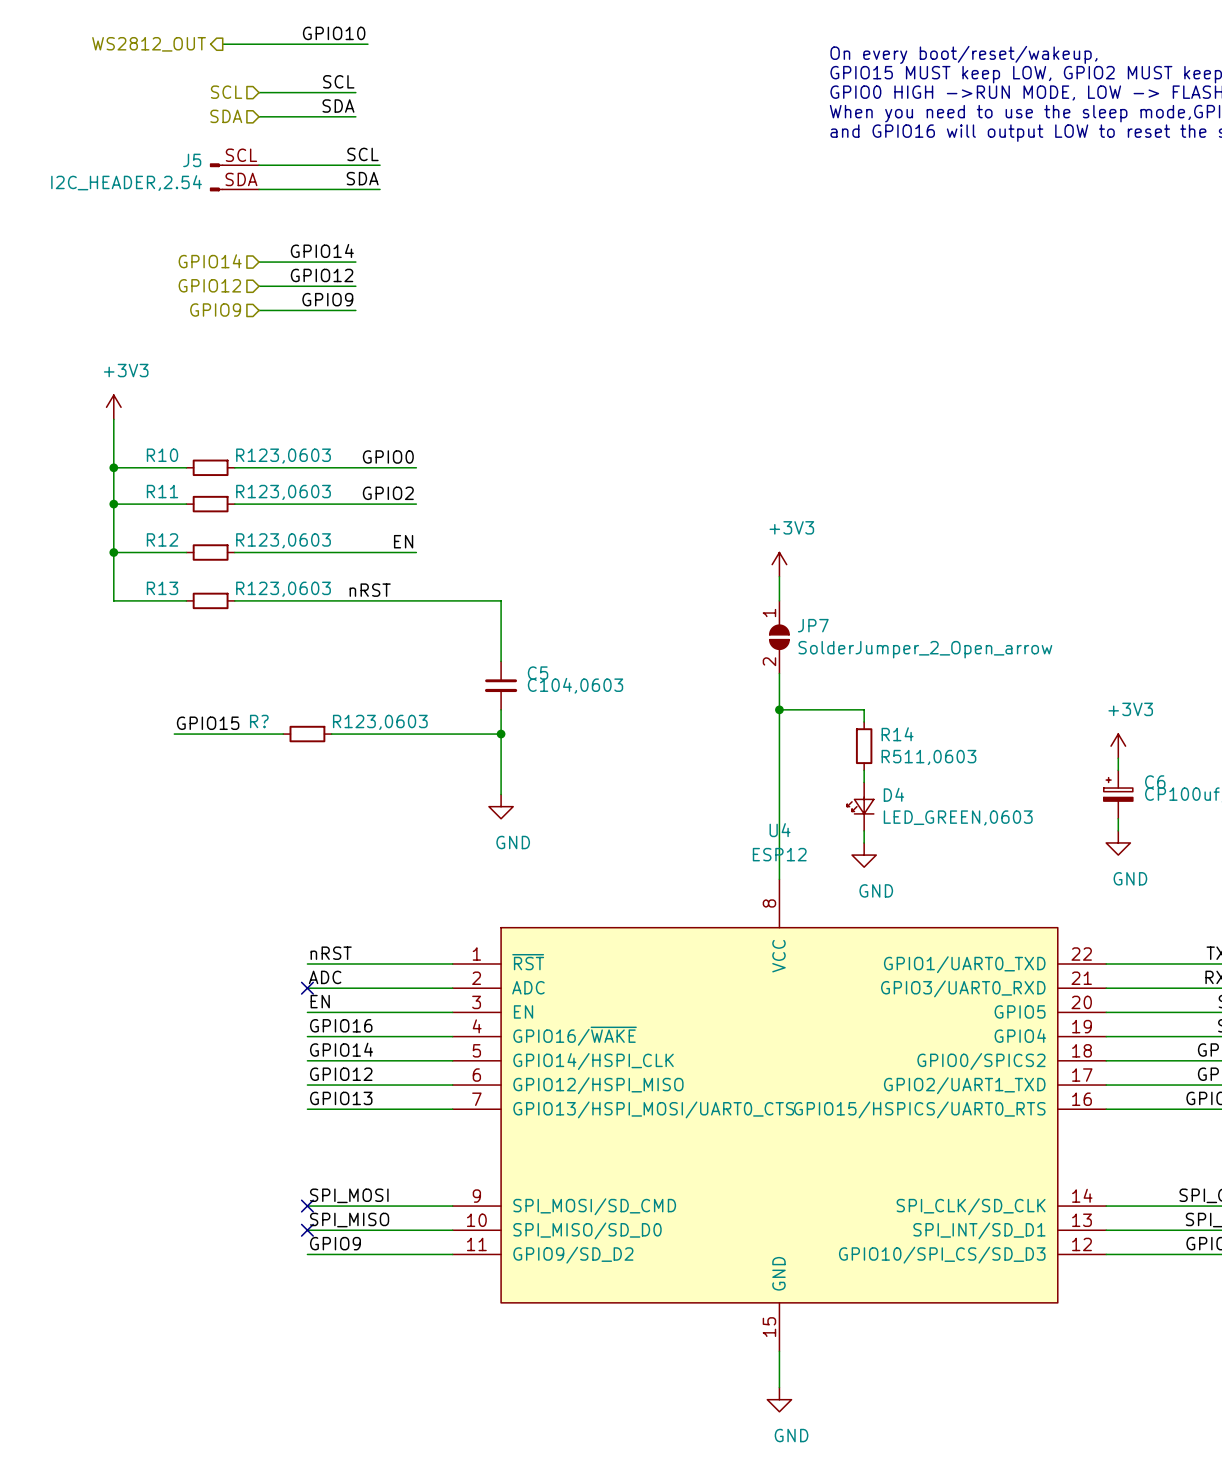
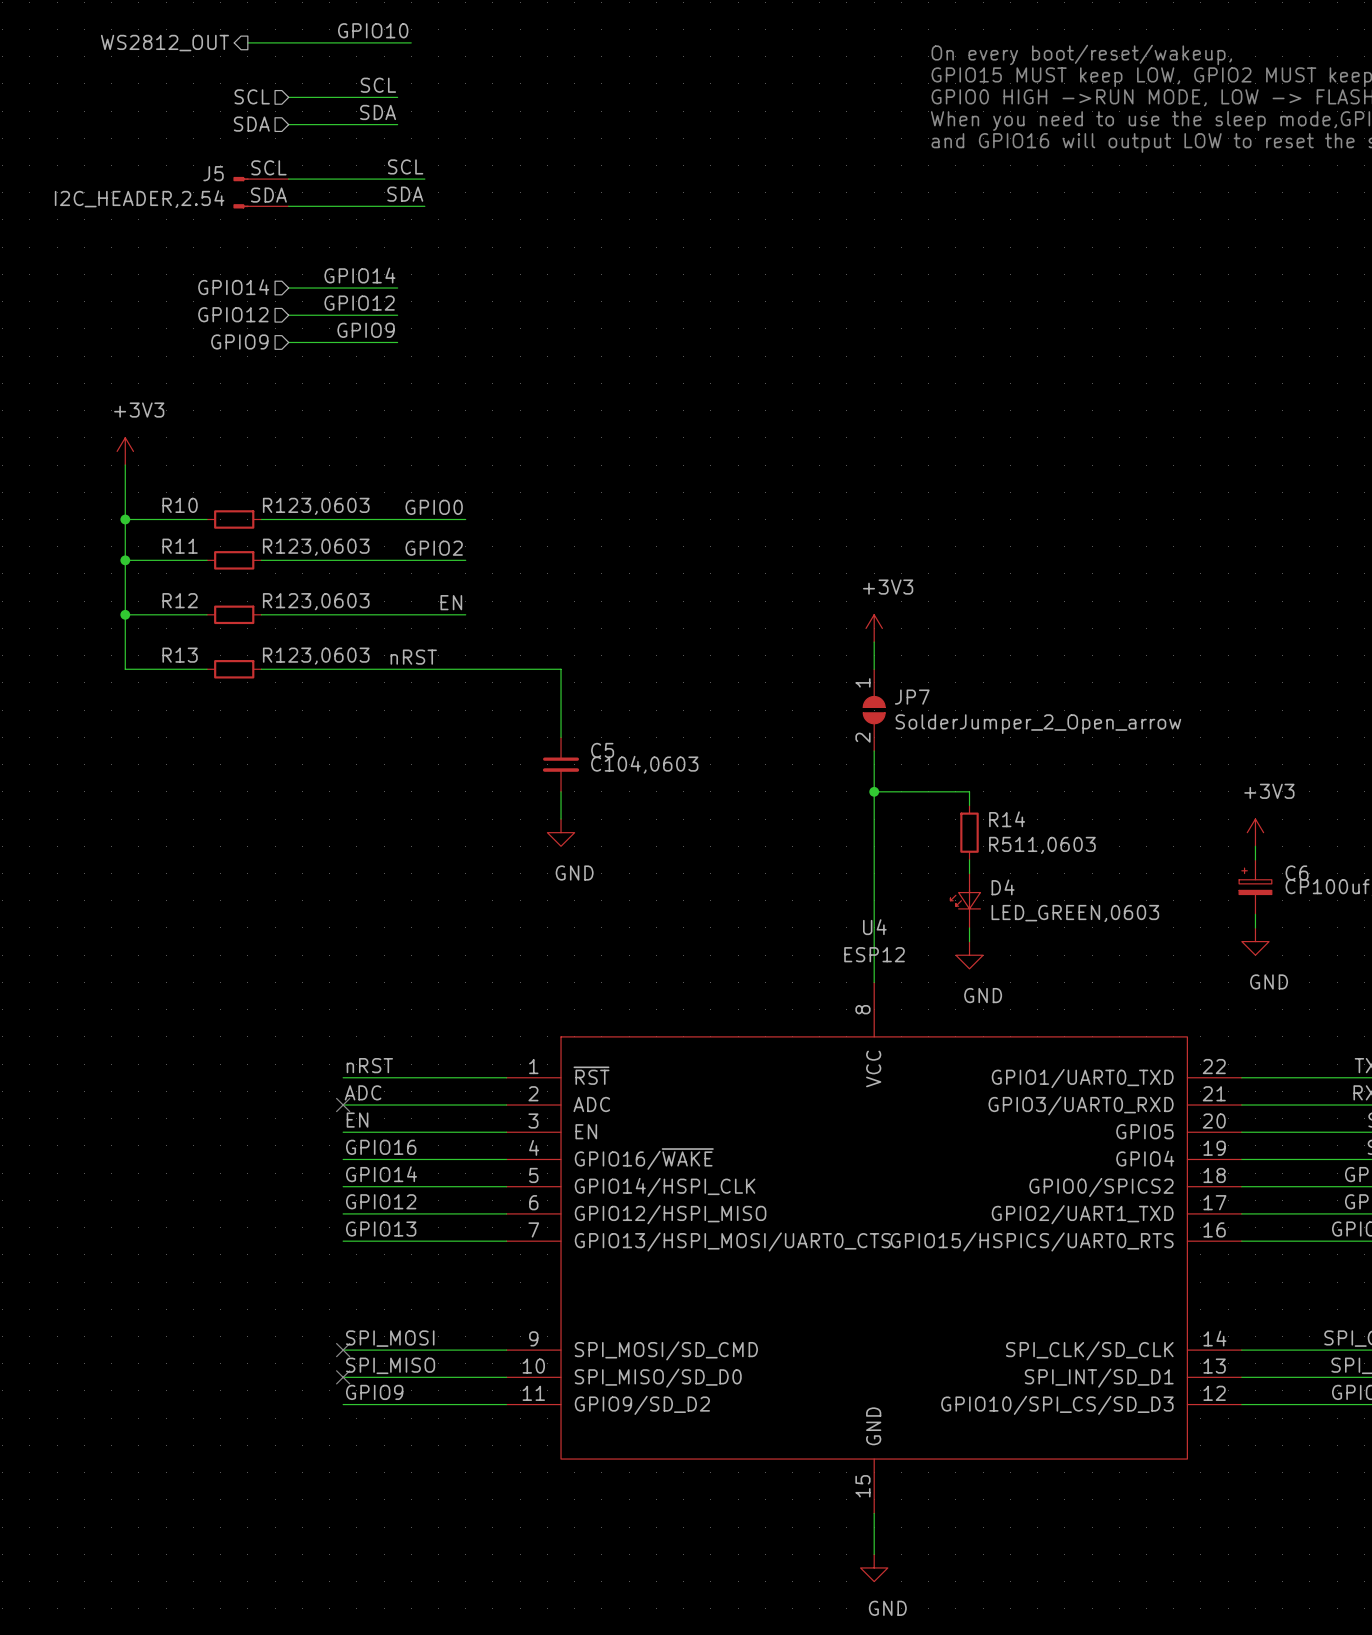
label: GPIO15 (208, 723) -> none
wire: (174, 734) (283, 734) -> none
R?: R123,0603 (307, 734) -> none
wire: (331, 734) (501, 734) (501, 794) -> none
junction: (501, 734) -> none
power symbol position: GND (501, 806) -> GND (561, 832)

